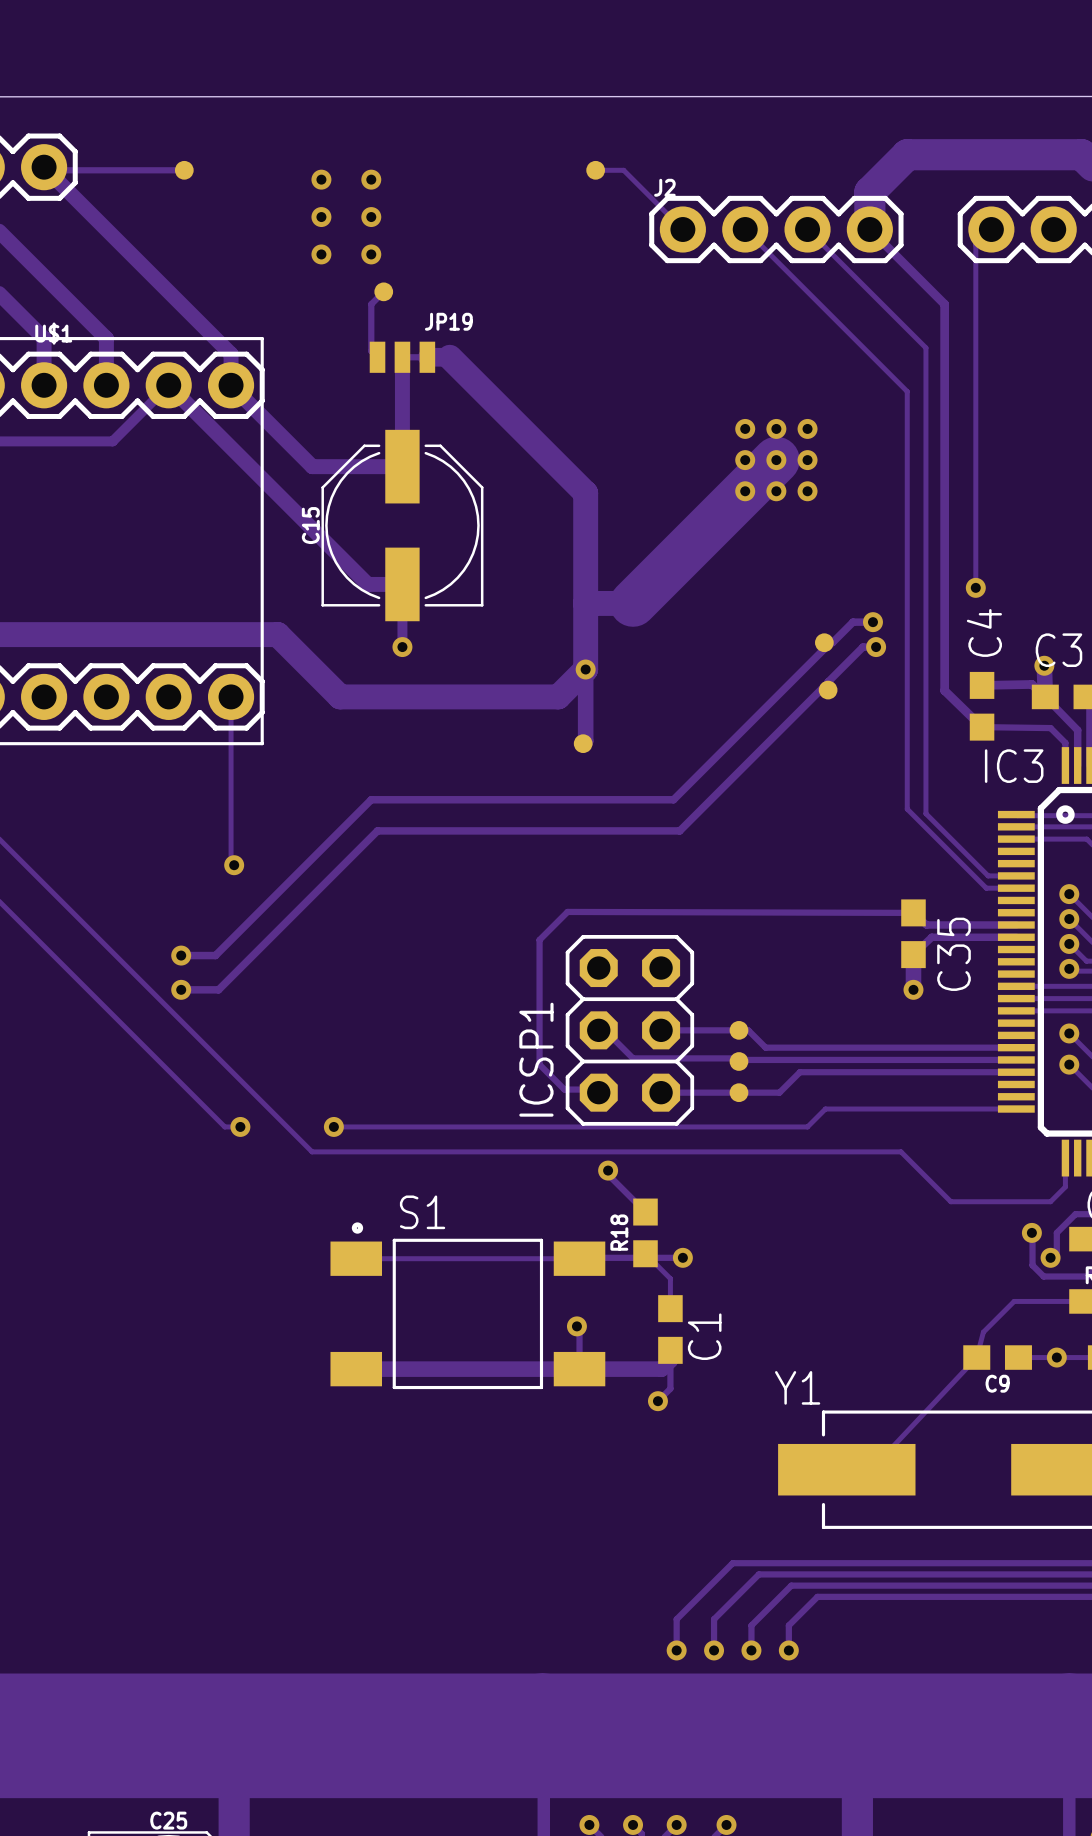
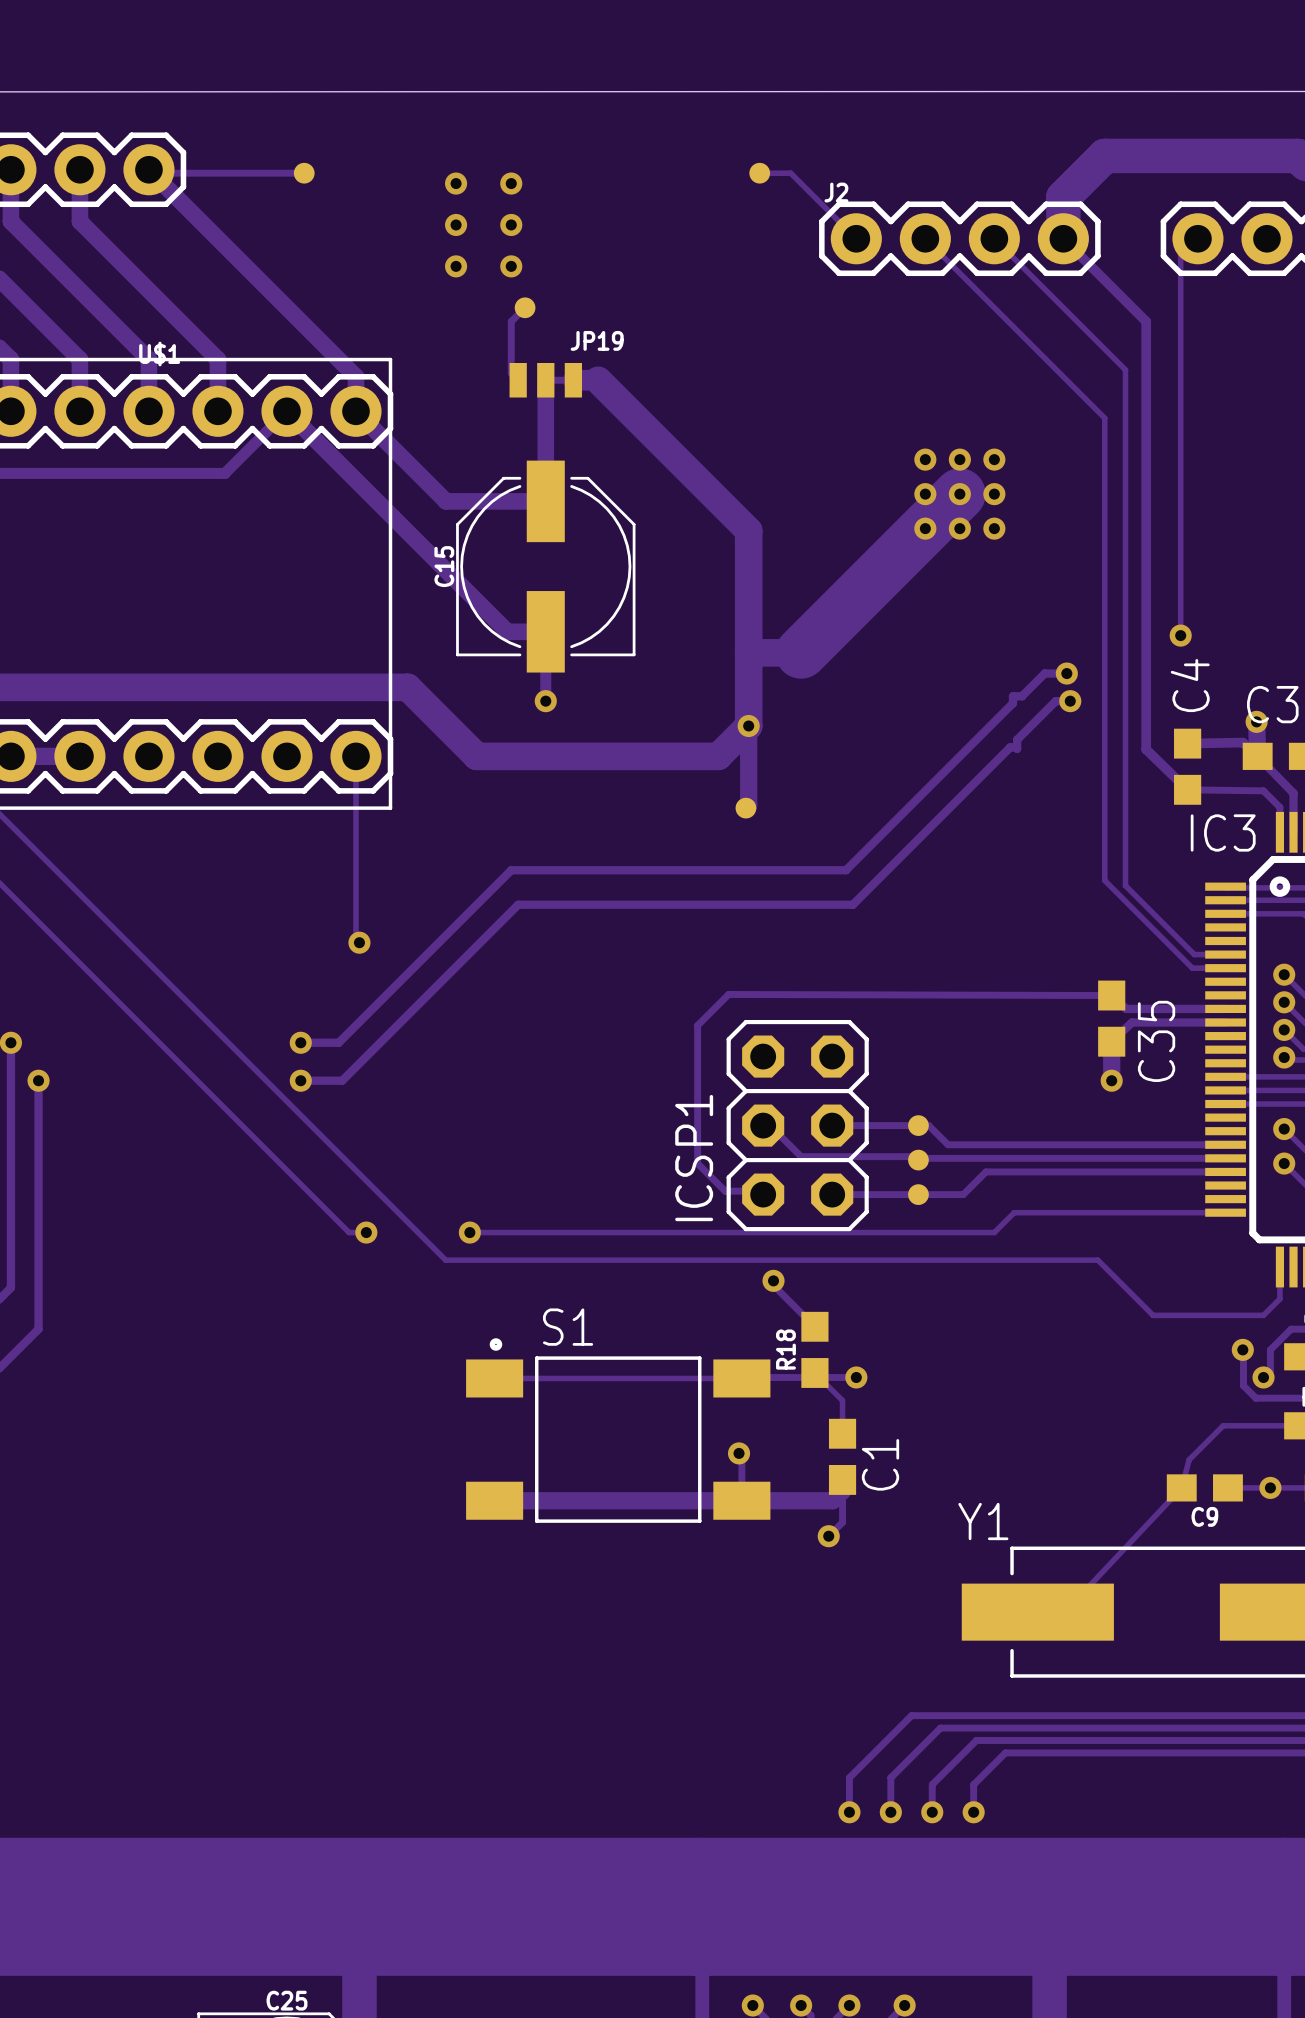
part: (824, 642) -> none
part: (828, 690) -> none

